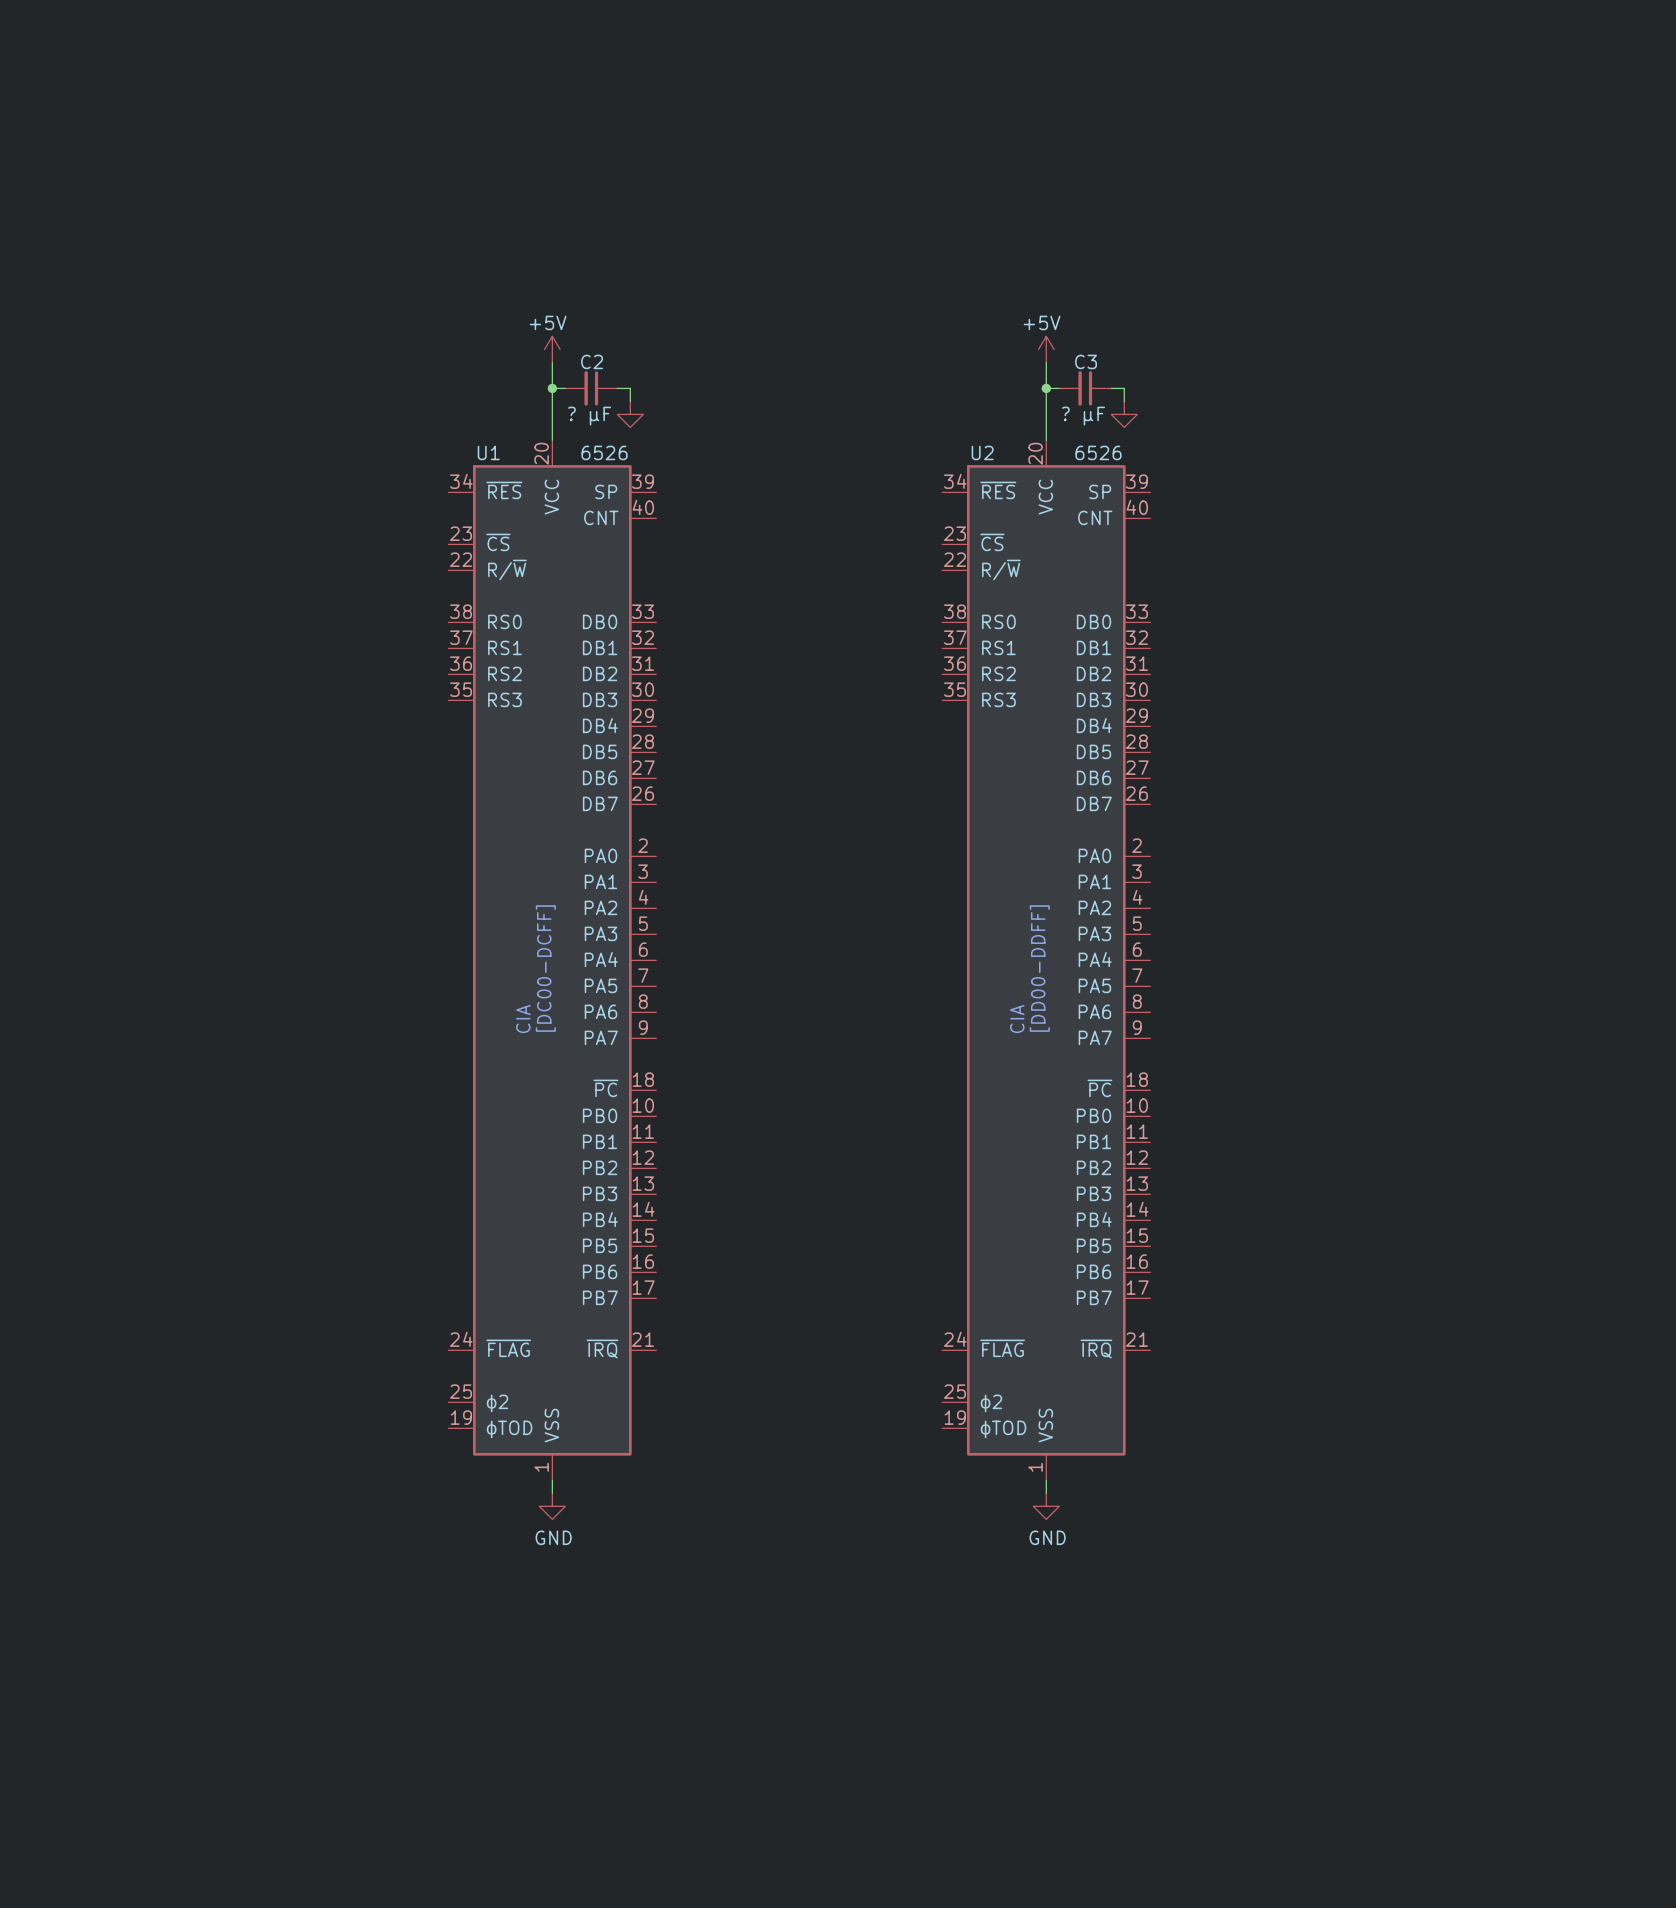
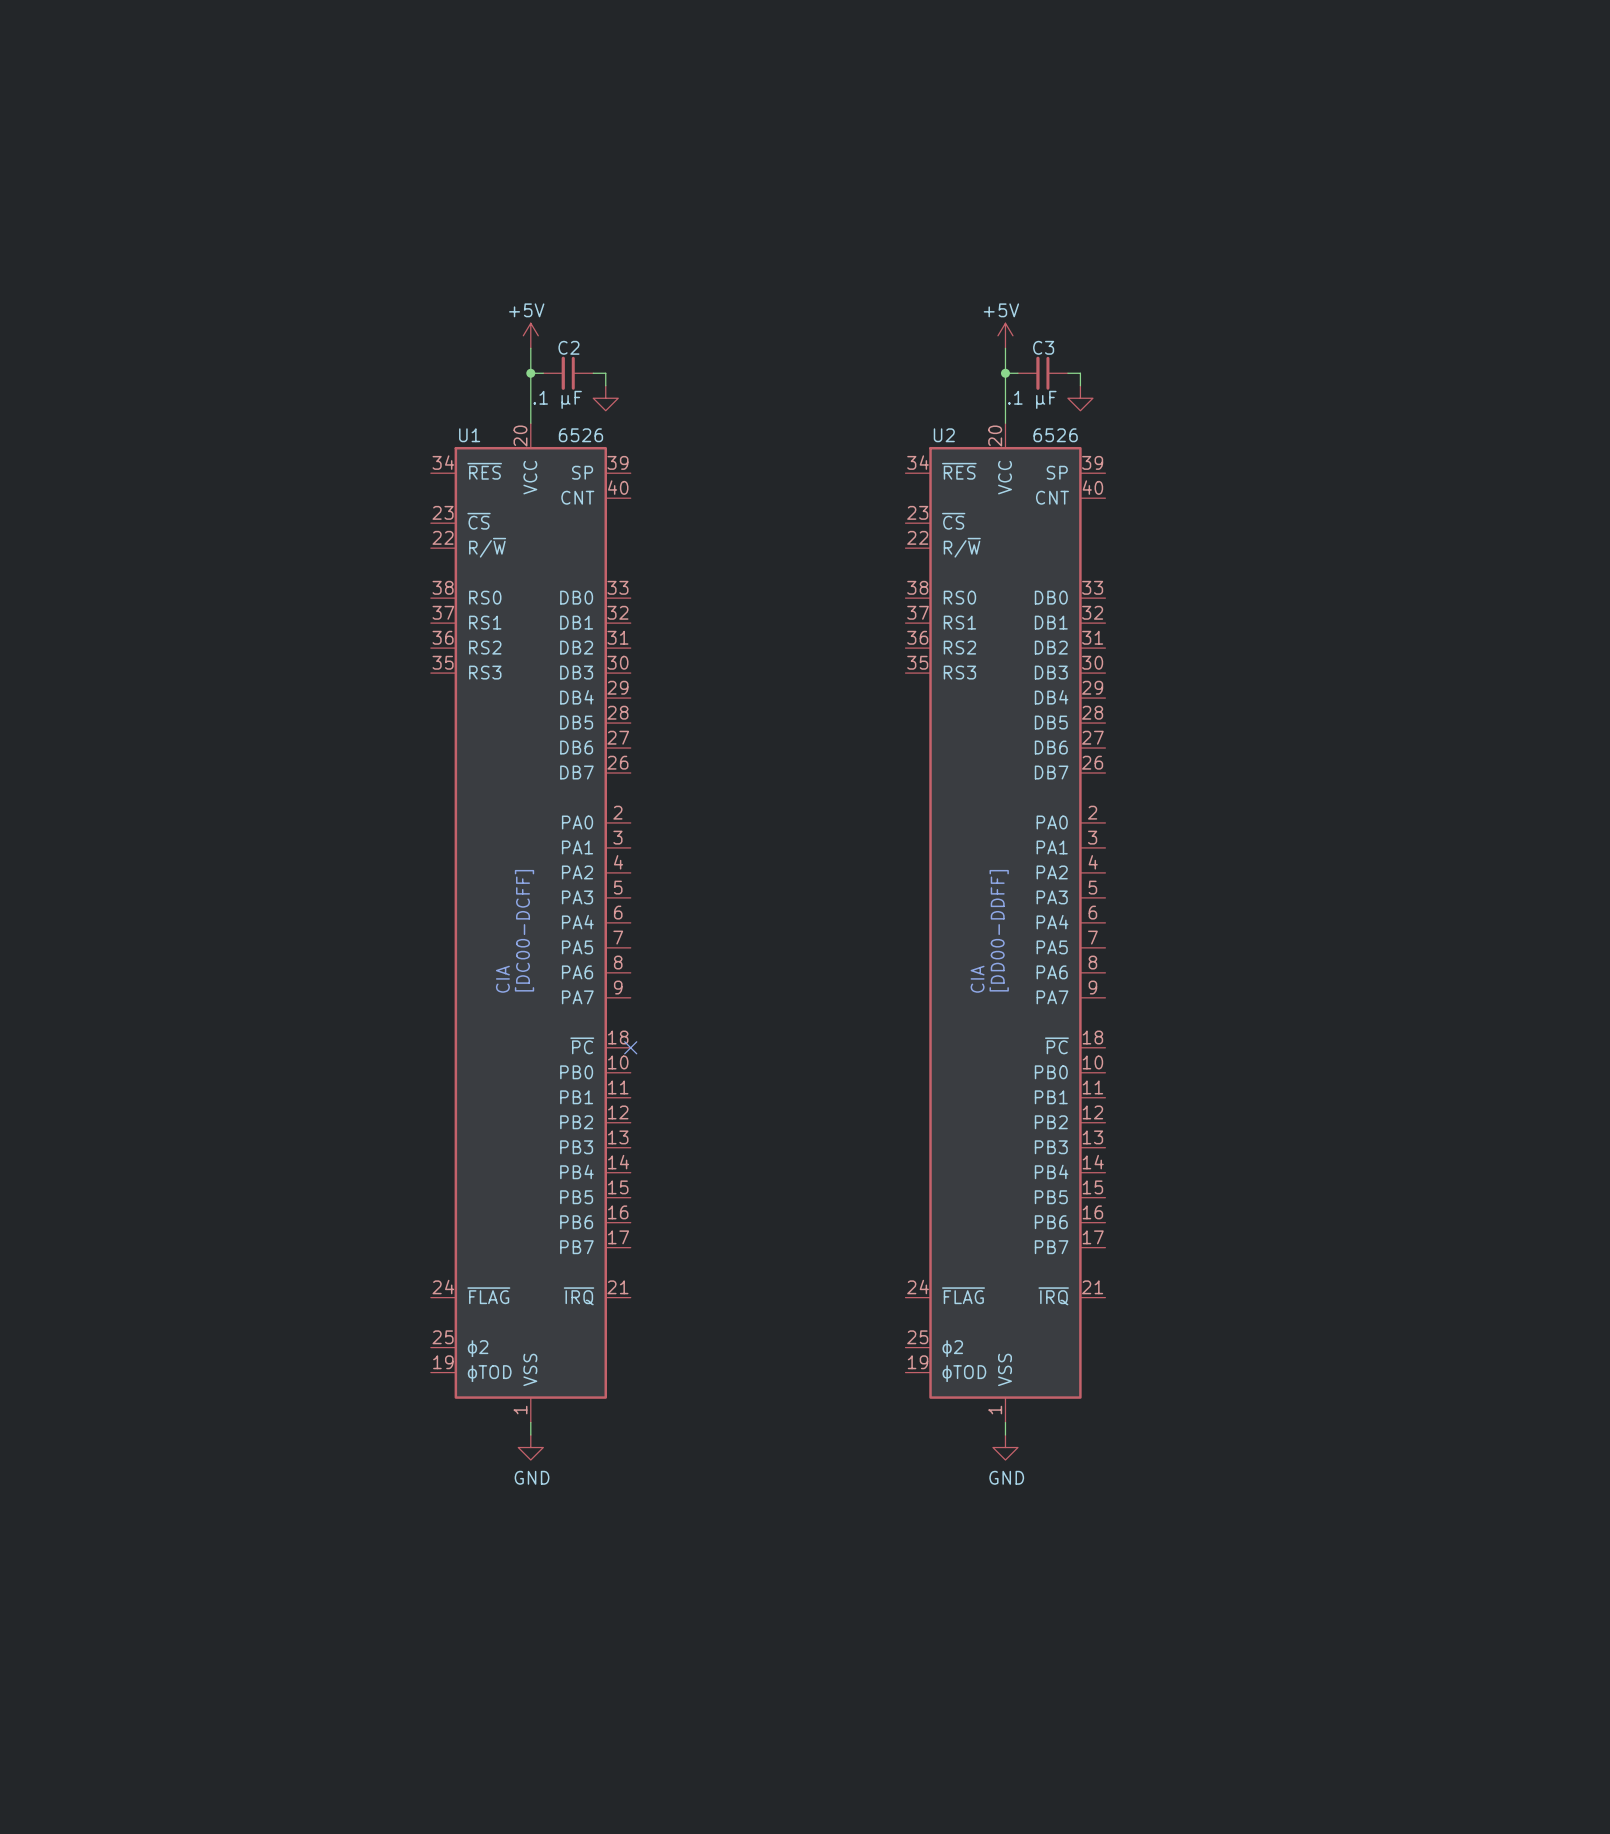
C2 value: ? μF (589, 416) -> .1 μF (557, 399)
C3 value: ? μF (1083, 416) -> .1 μF (1032, 399)
no-connect mark: none -> (630, 1047)

